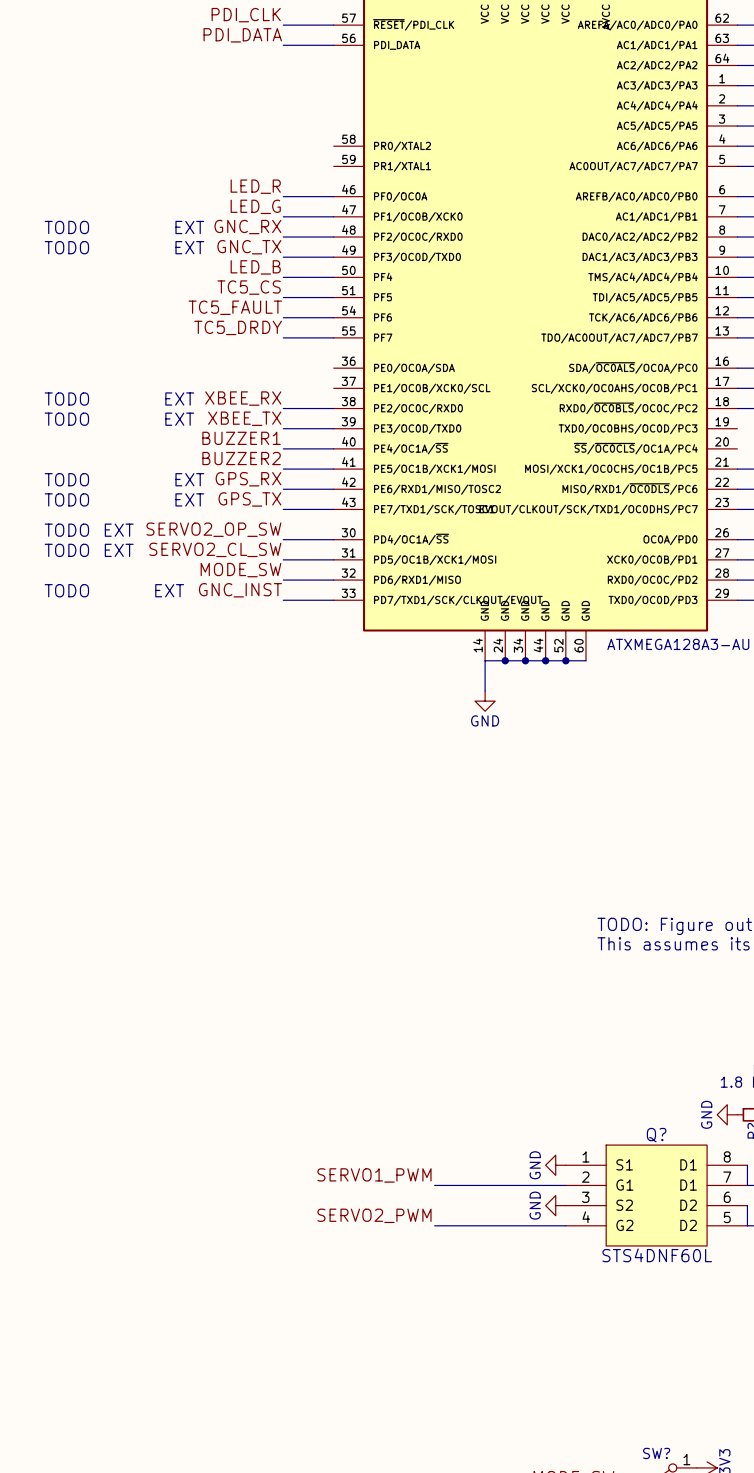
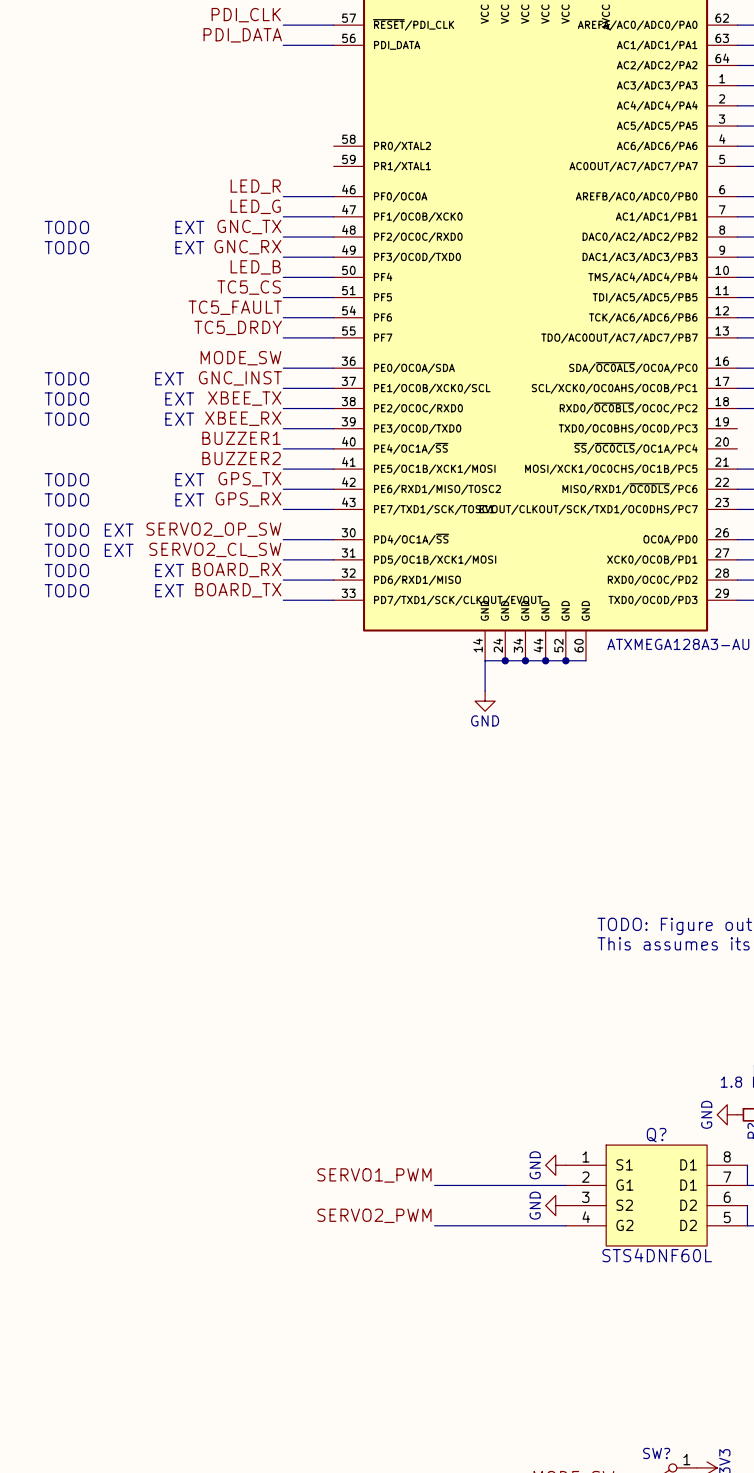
label: GNC_RX (247, 227) -> GNC_TX (249, 227)
label: GNC_TX (249, 247) -> GNC_RX (247, 247)
label: none -> MODE_SW (241, 358)
wire: none -> (283, 368) (333, 368)
text: none -> TODO (66, 378)
text: none -> EXT (169, 378)
label: none -> GNC_INST (240, 378)
wire: none -> (283, 388) (333, 388)
label: XBEE_RX (243, 398) -> XBEE_TX (244, 398)
label: XBEE_TX (244, 418) -> XBEE_RX (243, 418)
label: GPS_RX (248, 479) -> GPS_TX (249, 479)
label: GPS_TX (249, 499) -> GPS_RX (248, 499)
text: none -> TODO (66, 570)
text: none -> EXT (169, 570)
label: MODE_SW (241, 570) -> BOARD_RX (236, 570)
label: GNC_INST (240, 590) -> BOARD_TX (238, 590)

